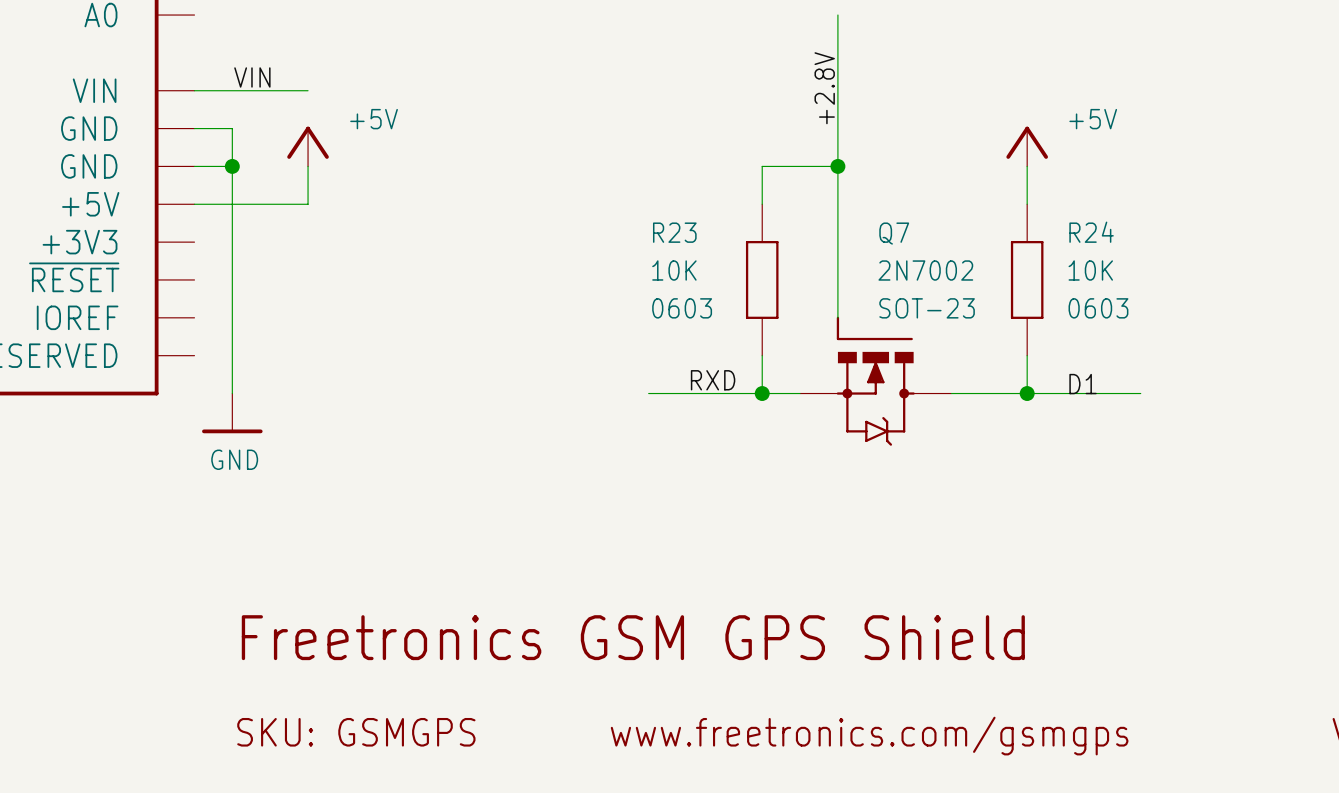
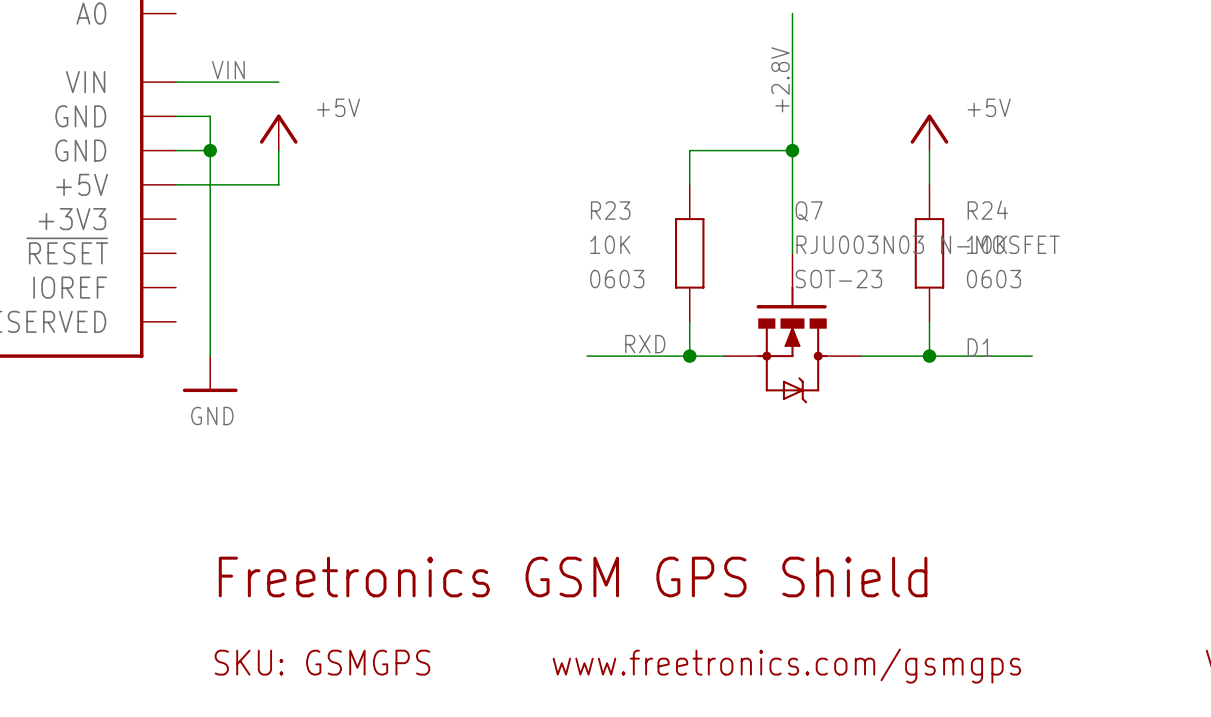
wire: (837, 15) (837, 317) -> none
wire: none -> (792, 13) (792, 253)
label position: +2.8V (824, 88) -> +2.8V (780, 79)
wire: none -> (758, 150) (792, 150)
junction position: (837, 166) -> (792, 150)
Q7 value: 2N7002 (925, 270) -> RJU003N03 N-MOSFET (928, 244)
Q7 symbol: [800, 316, 952, 446] -> [723, 253, 861, 404]

